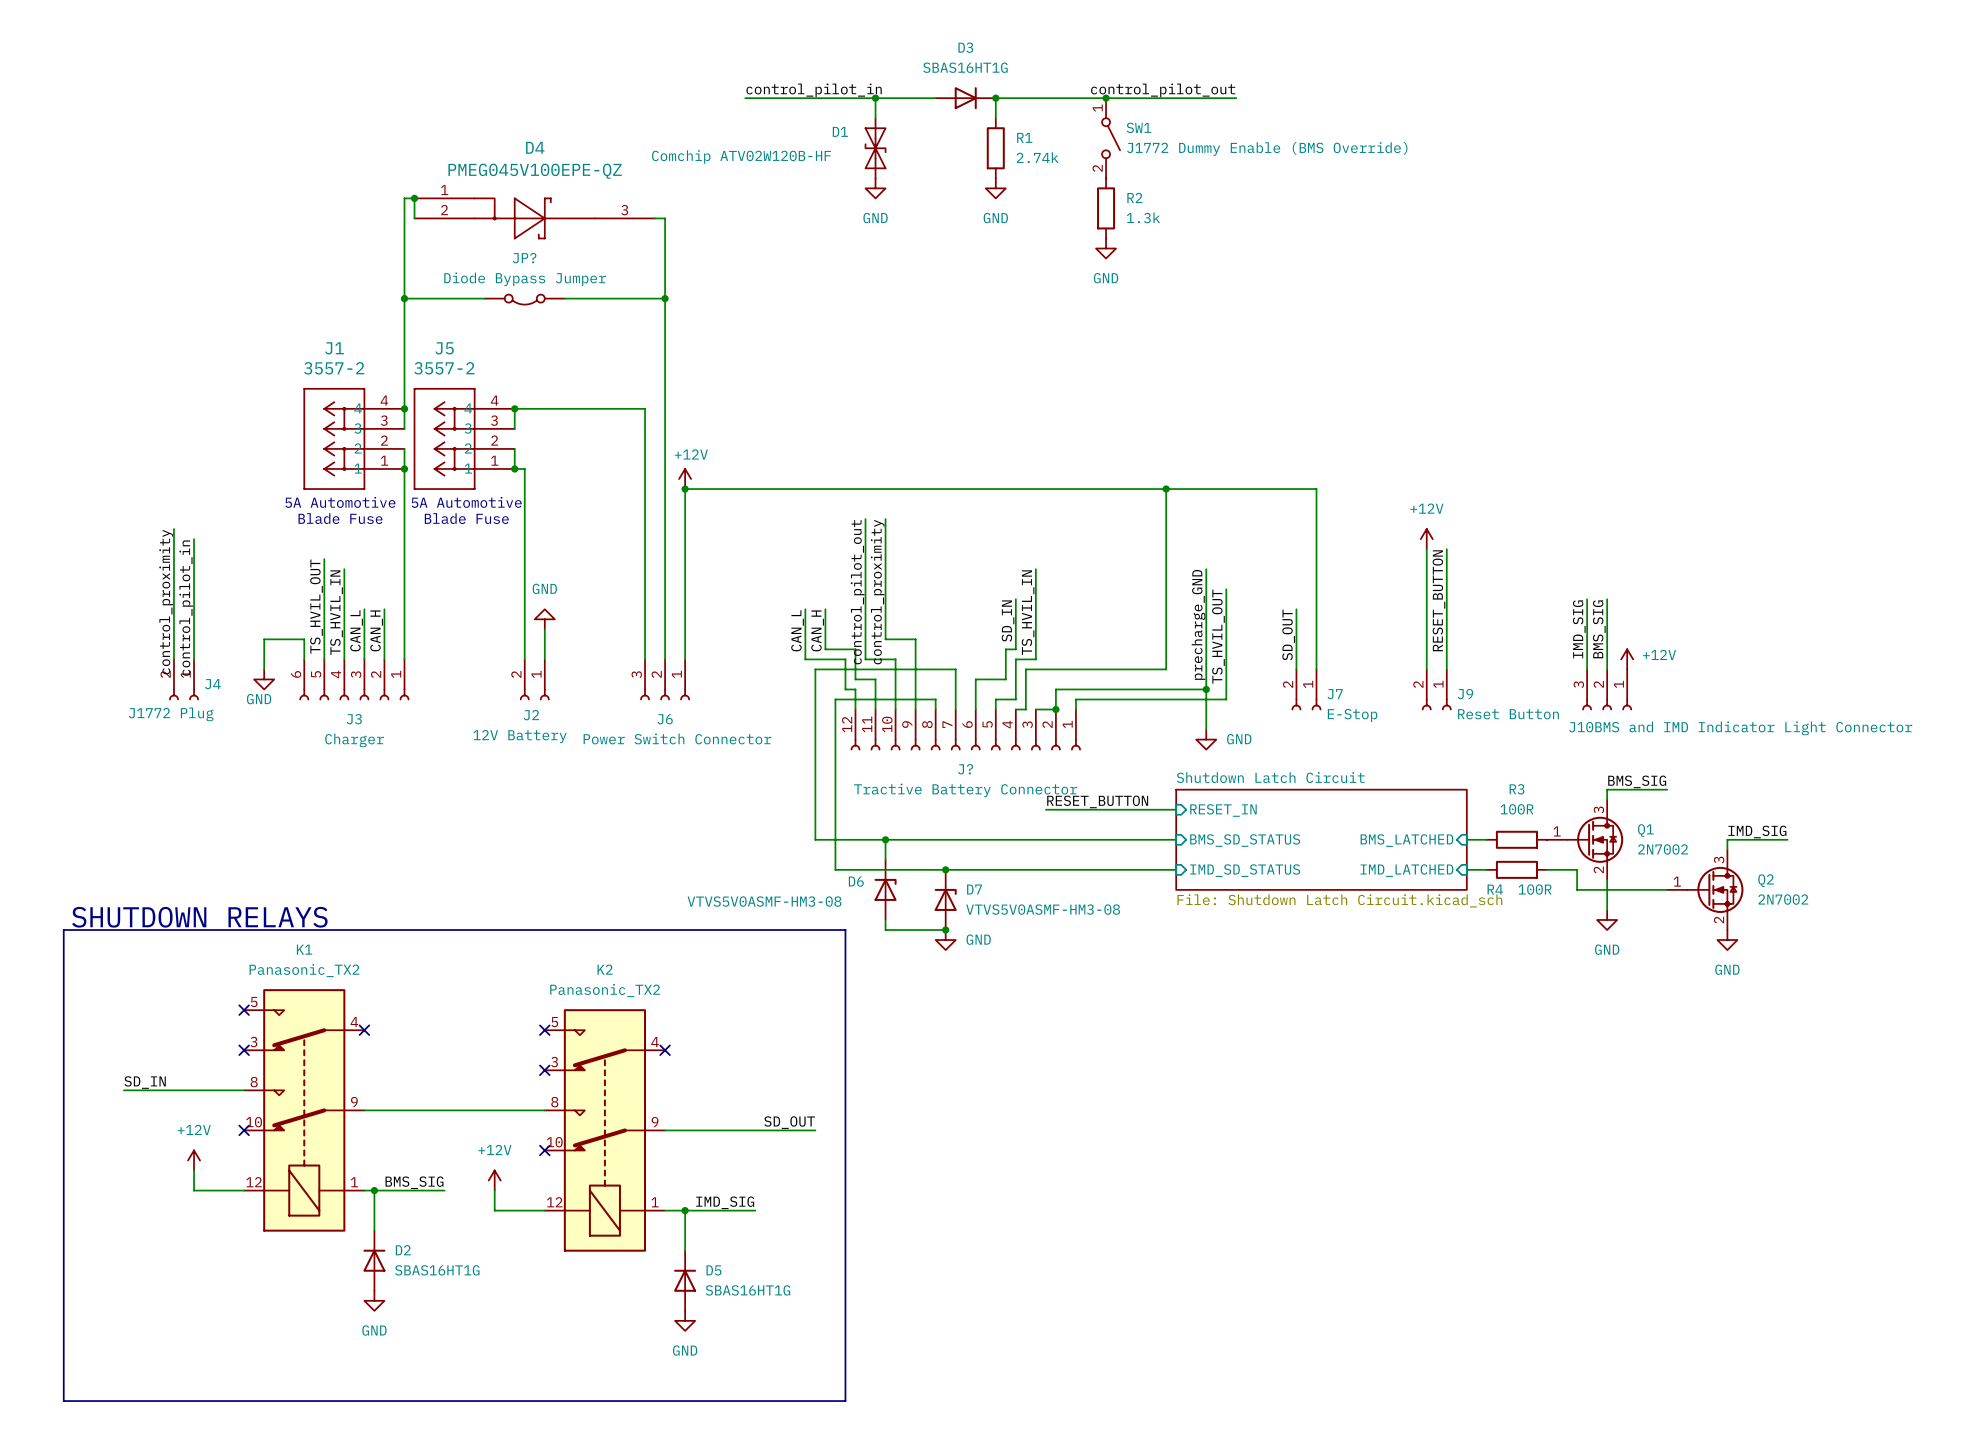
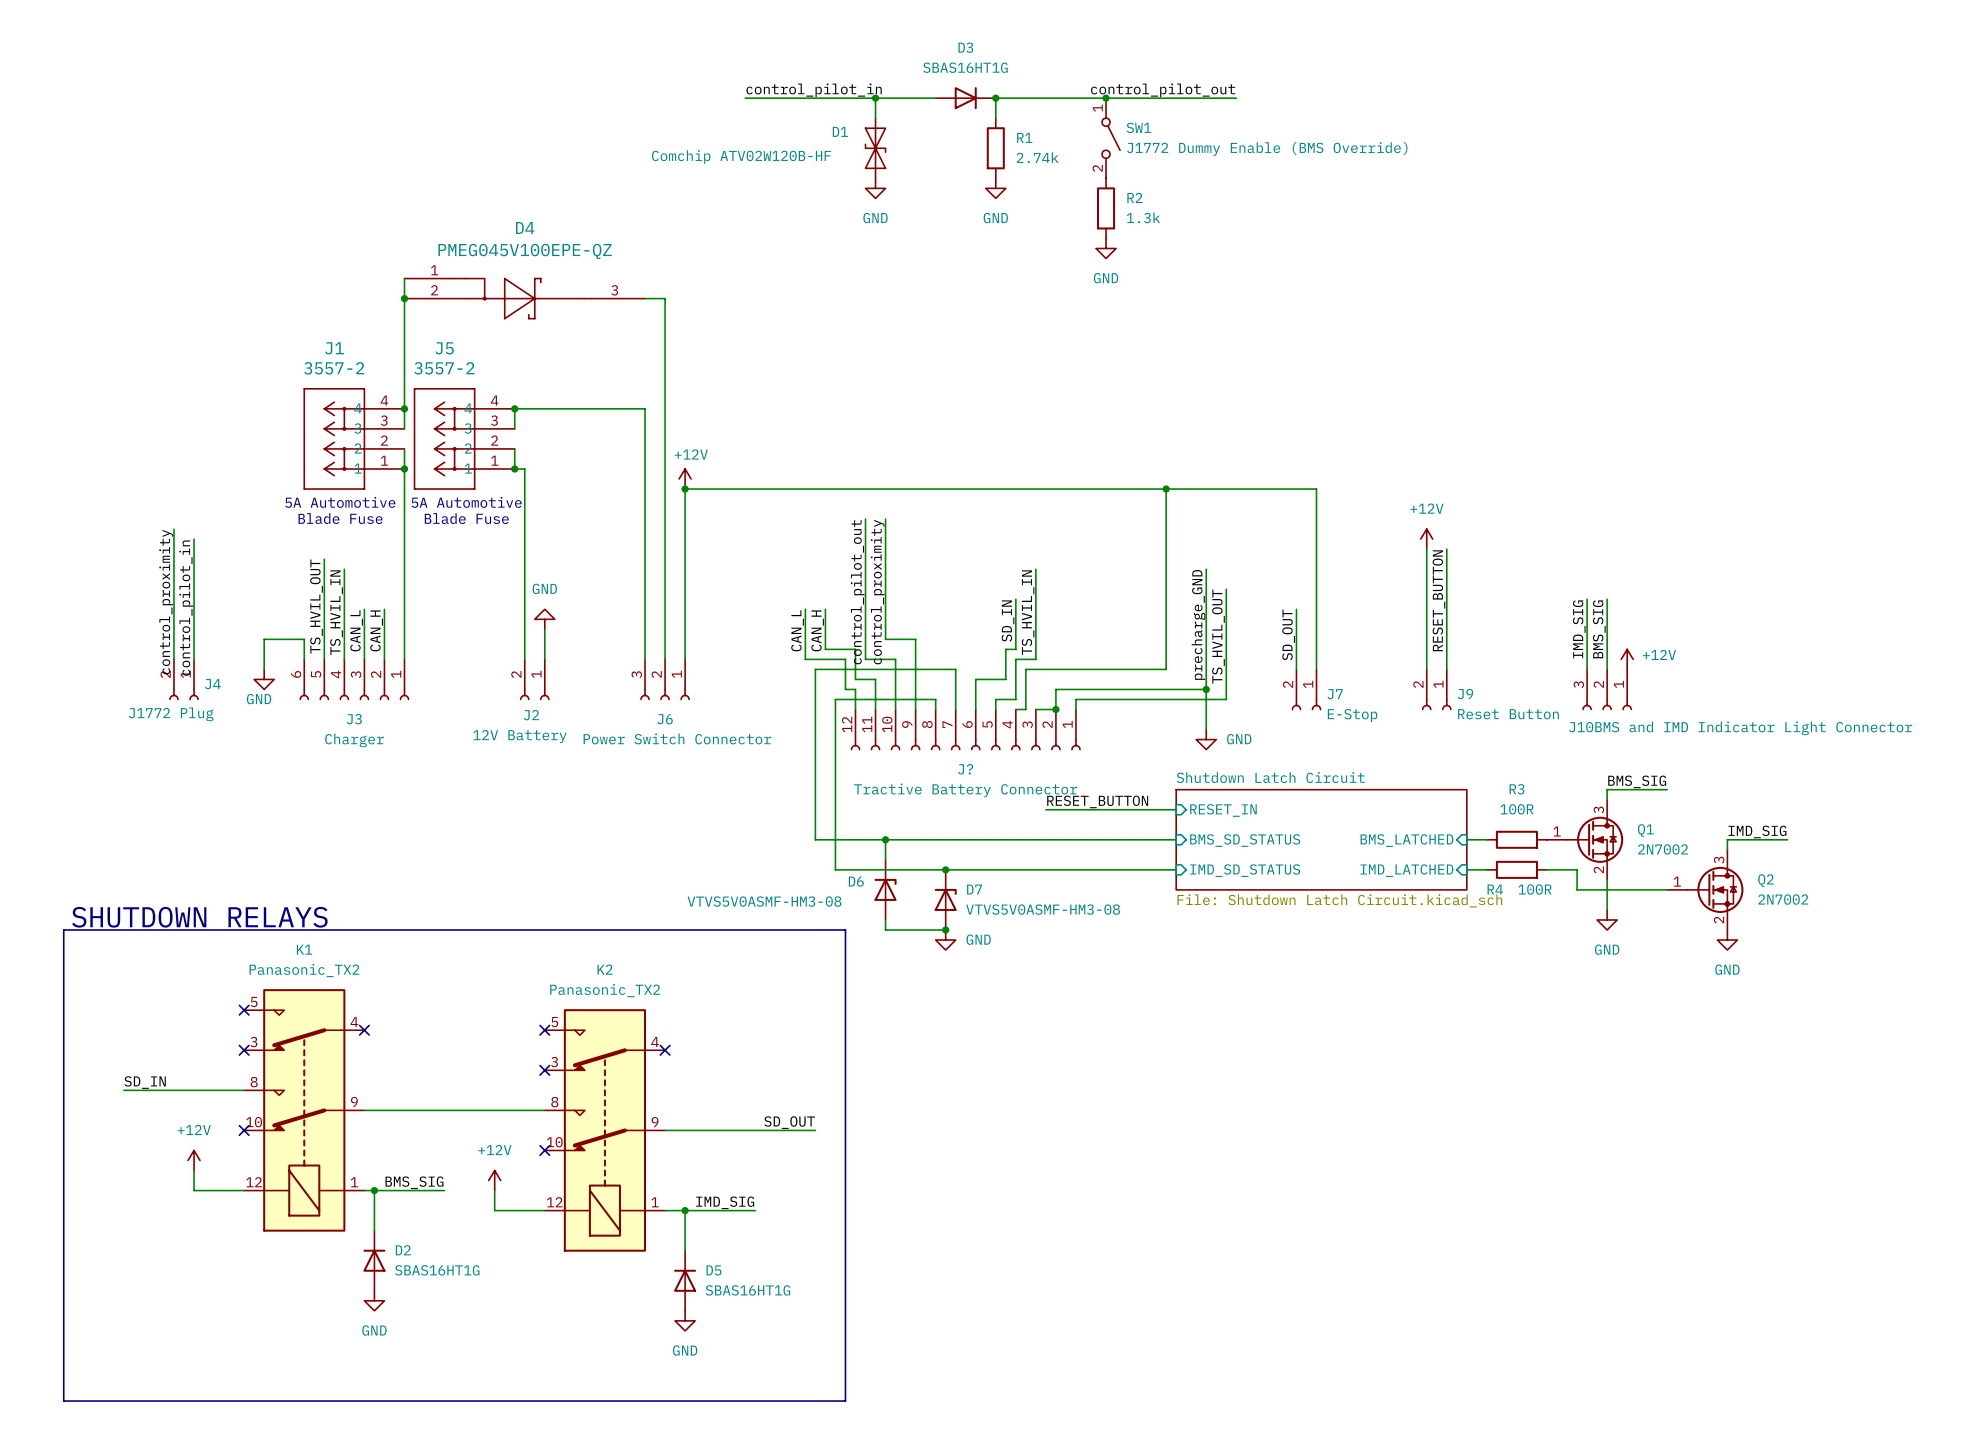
junction: (414, 198) -> none
wire: (414, 218) (414, 198) (404, 198) (404, 278) -> none
D4 position: (534, 218) -> (524, 298)
wire: (655, 218) (665, 218) (665, 298) -> none
junction: (665, 298) -> none
JP?: Diode Bypass Jumper (524, 299) -> none

